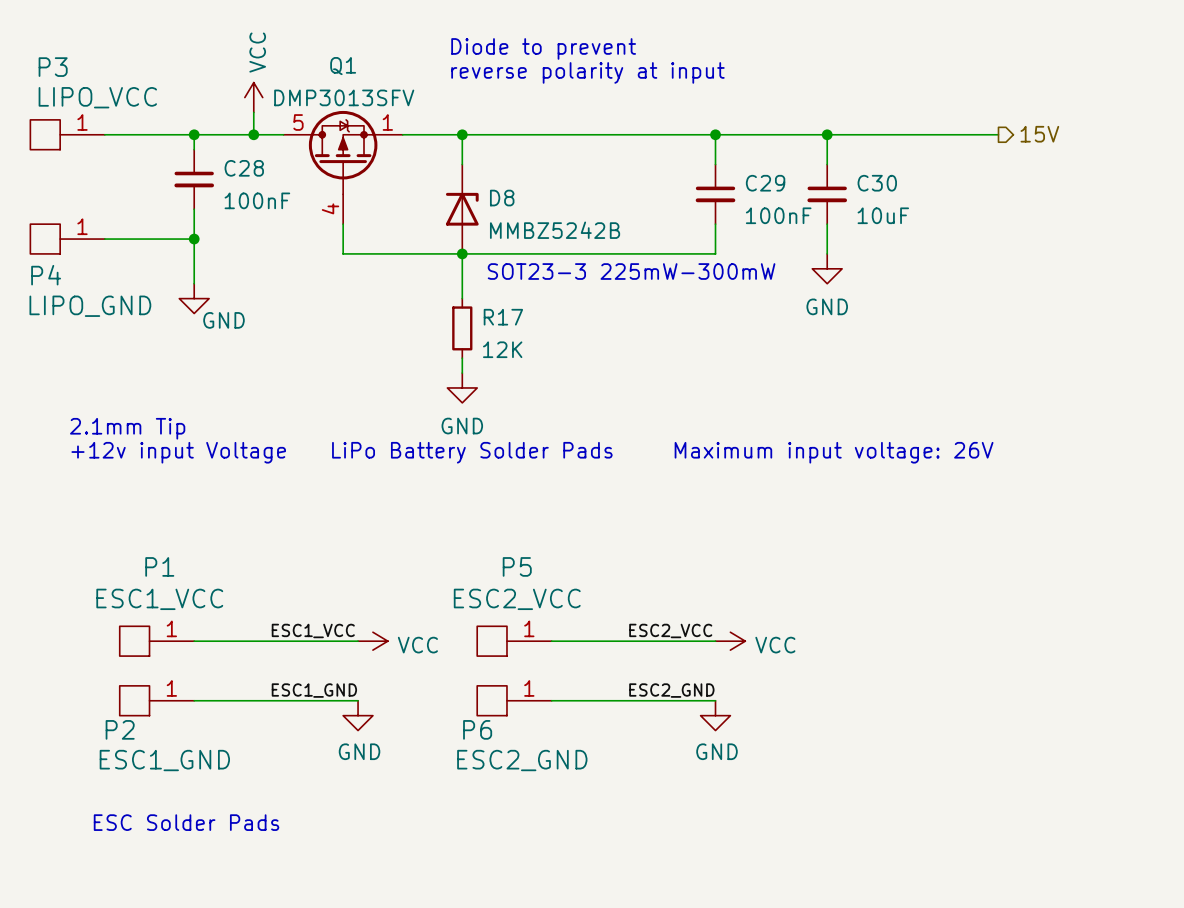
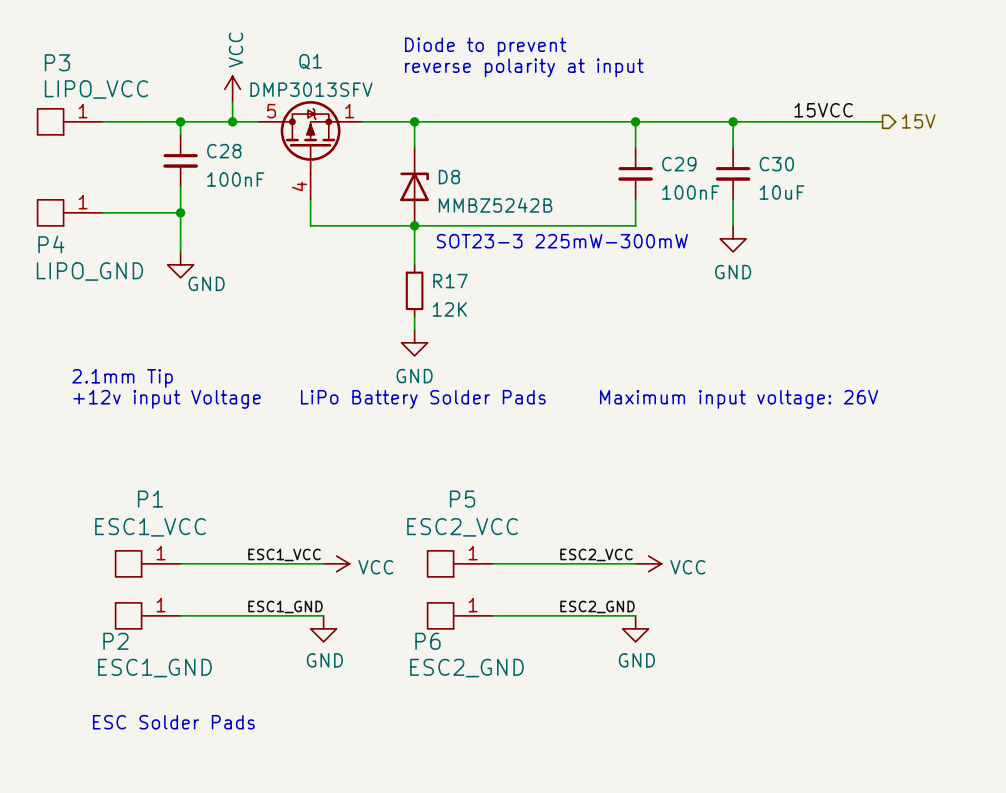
label: none -> 15VCC (823, 110)

